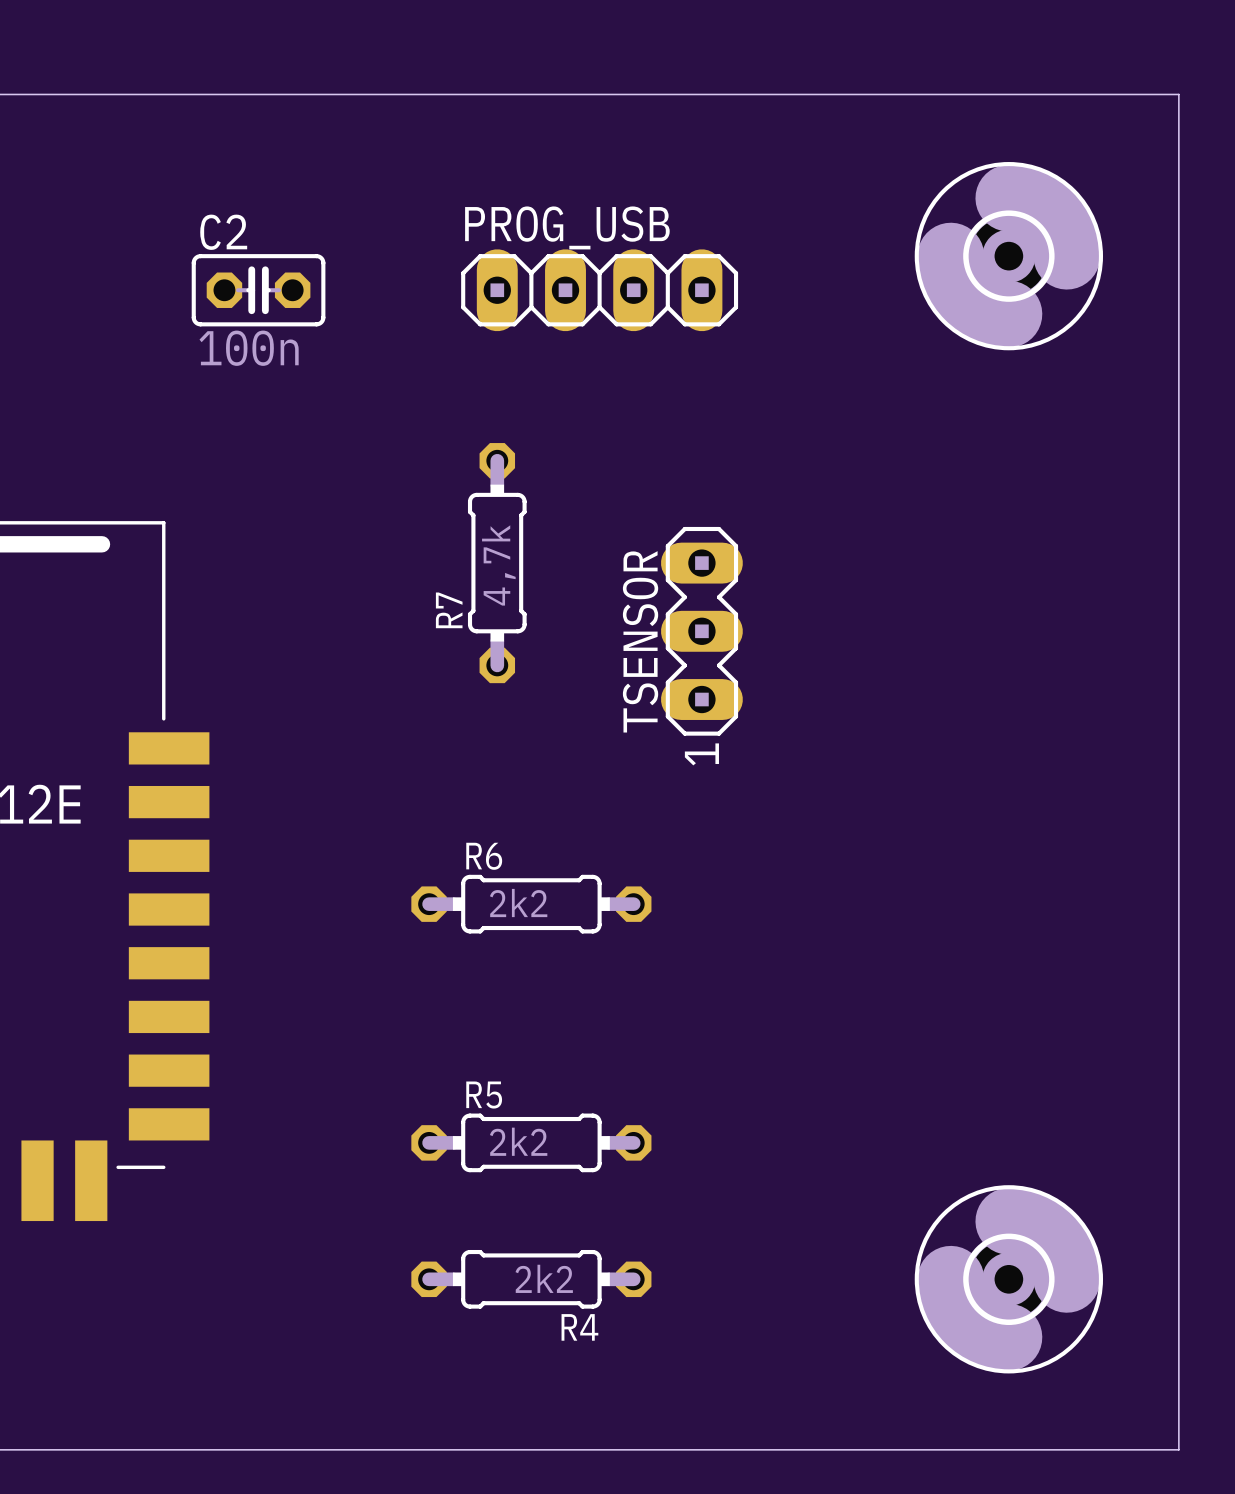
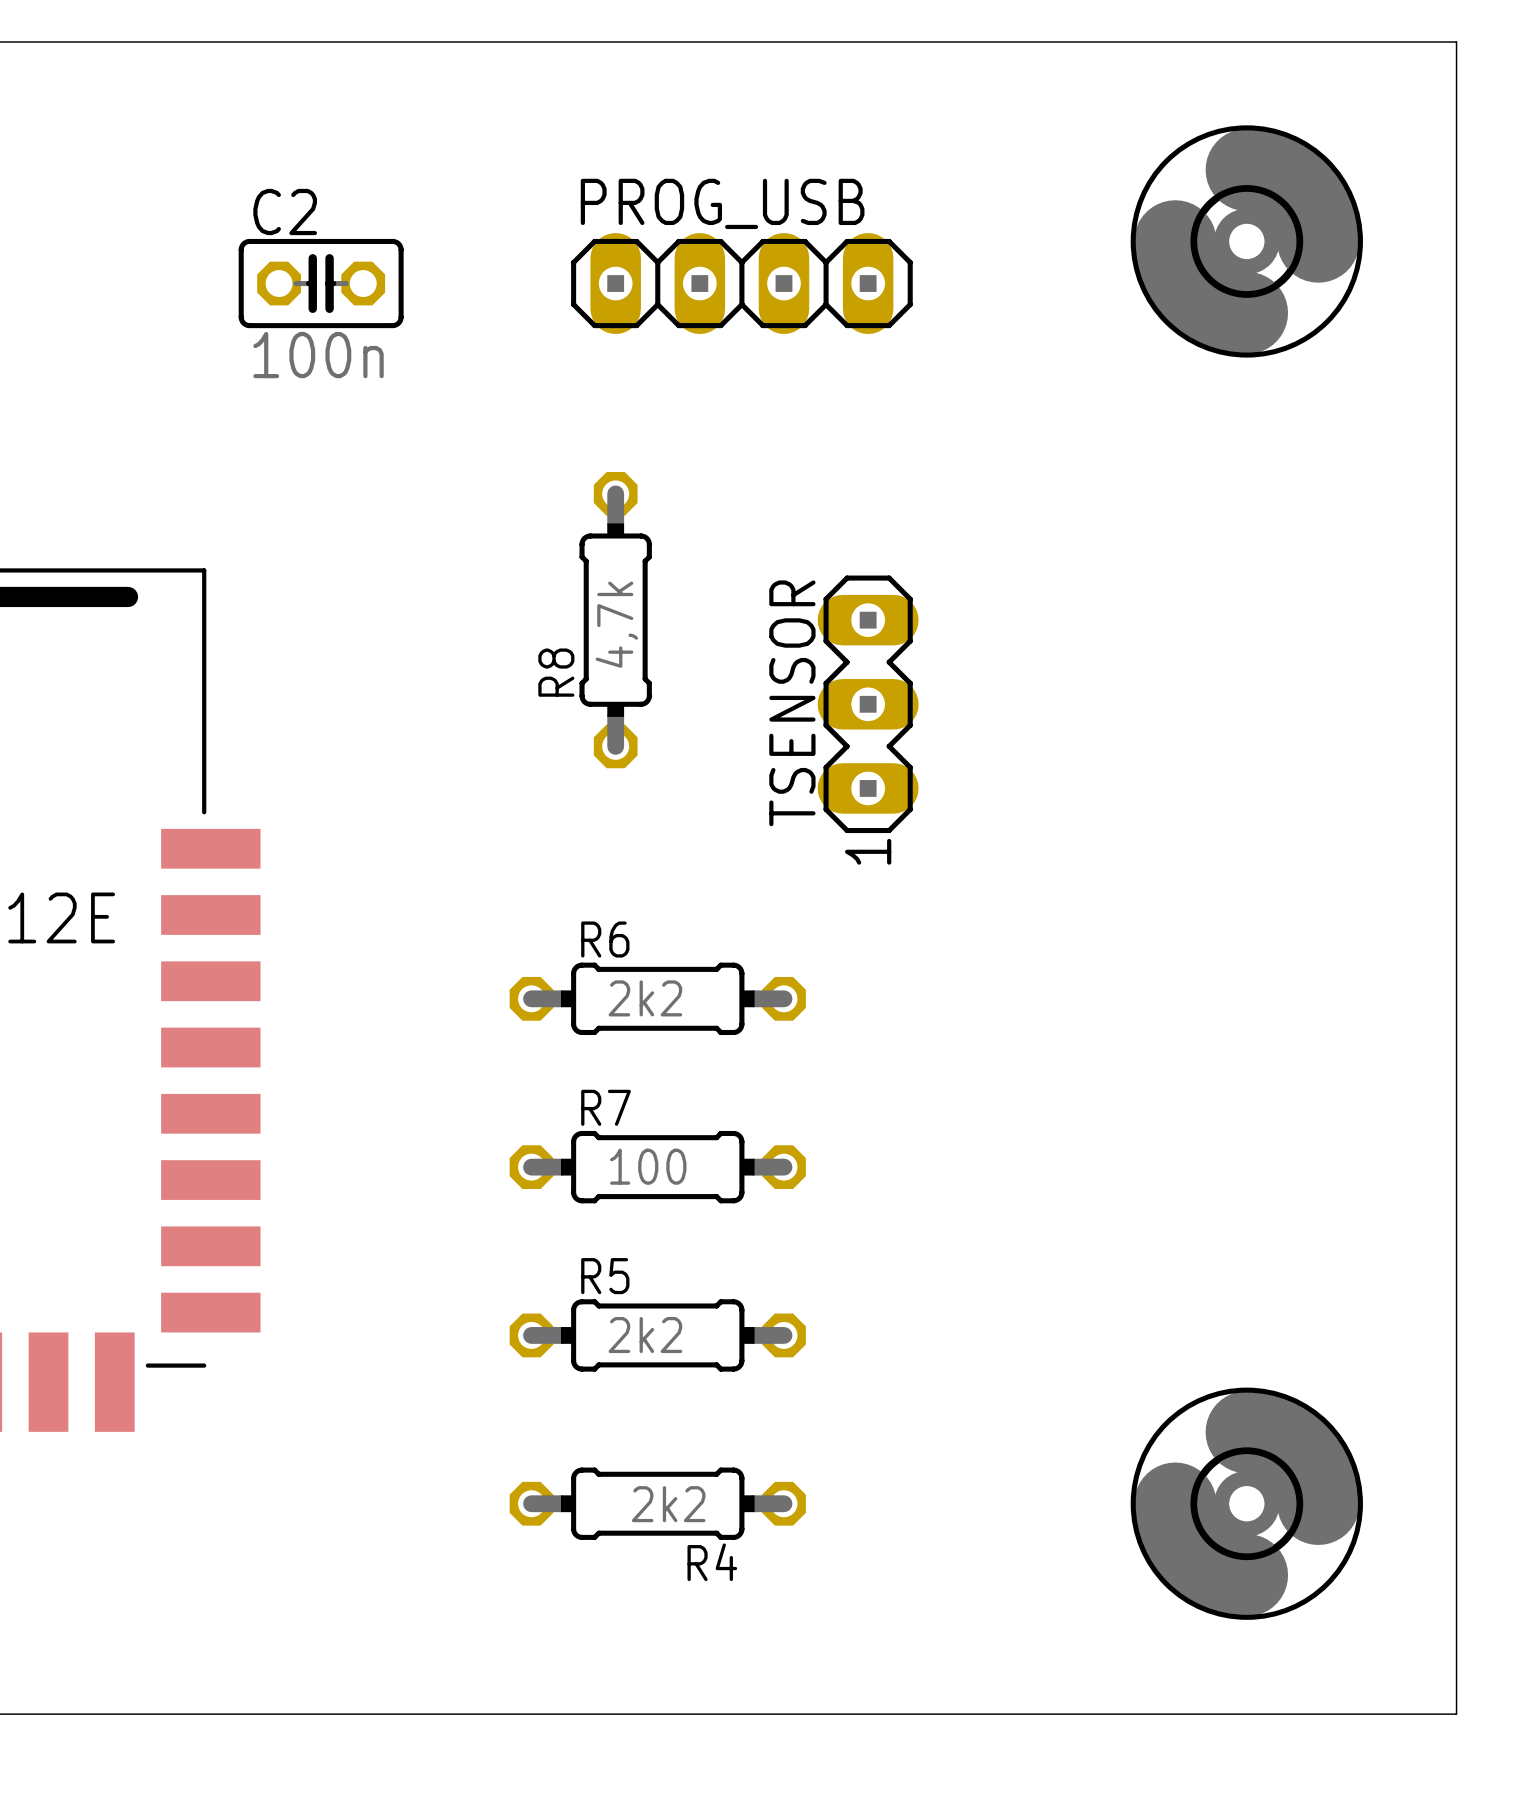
R7 name: R7 (449, 610) -> R8 (556, 672)
R6 position: (531, 904) -> (657, 998)
R7: none -> 100 (657, 1167)

